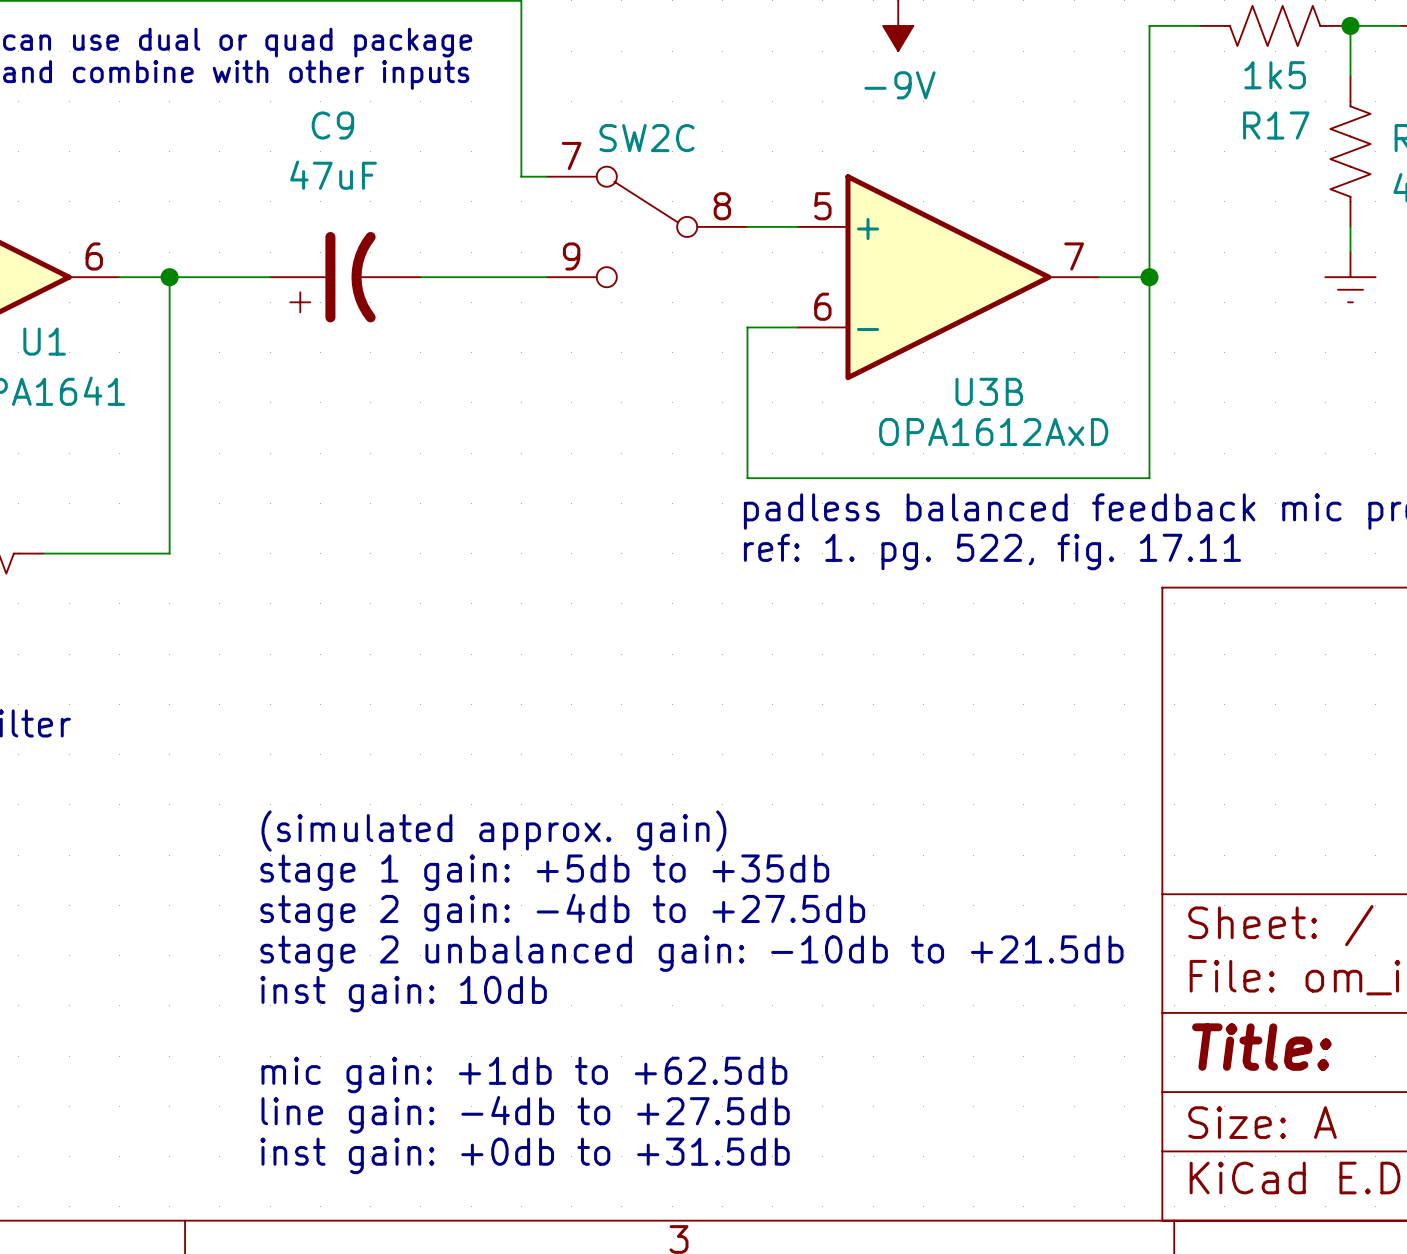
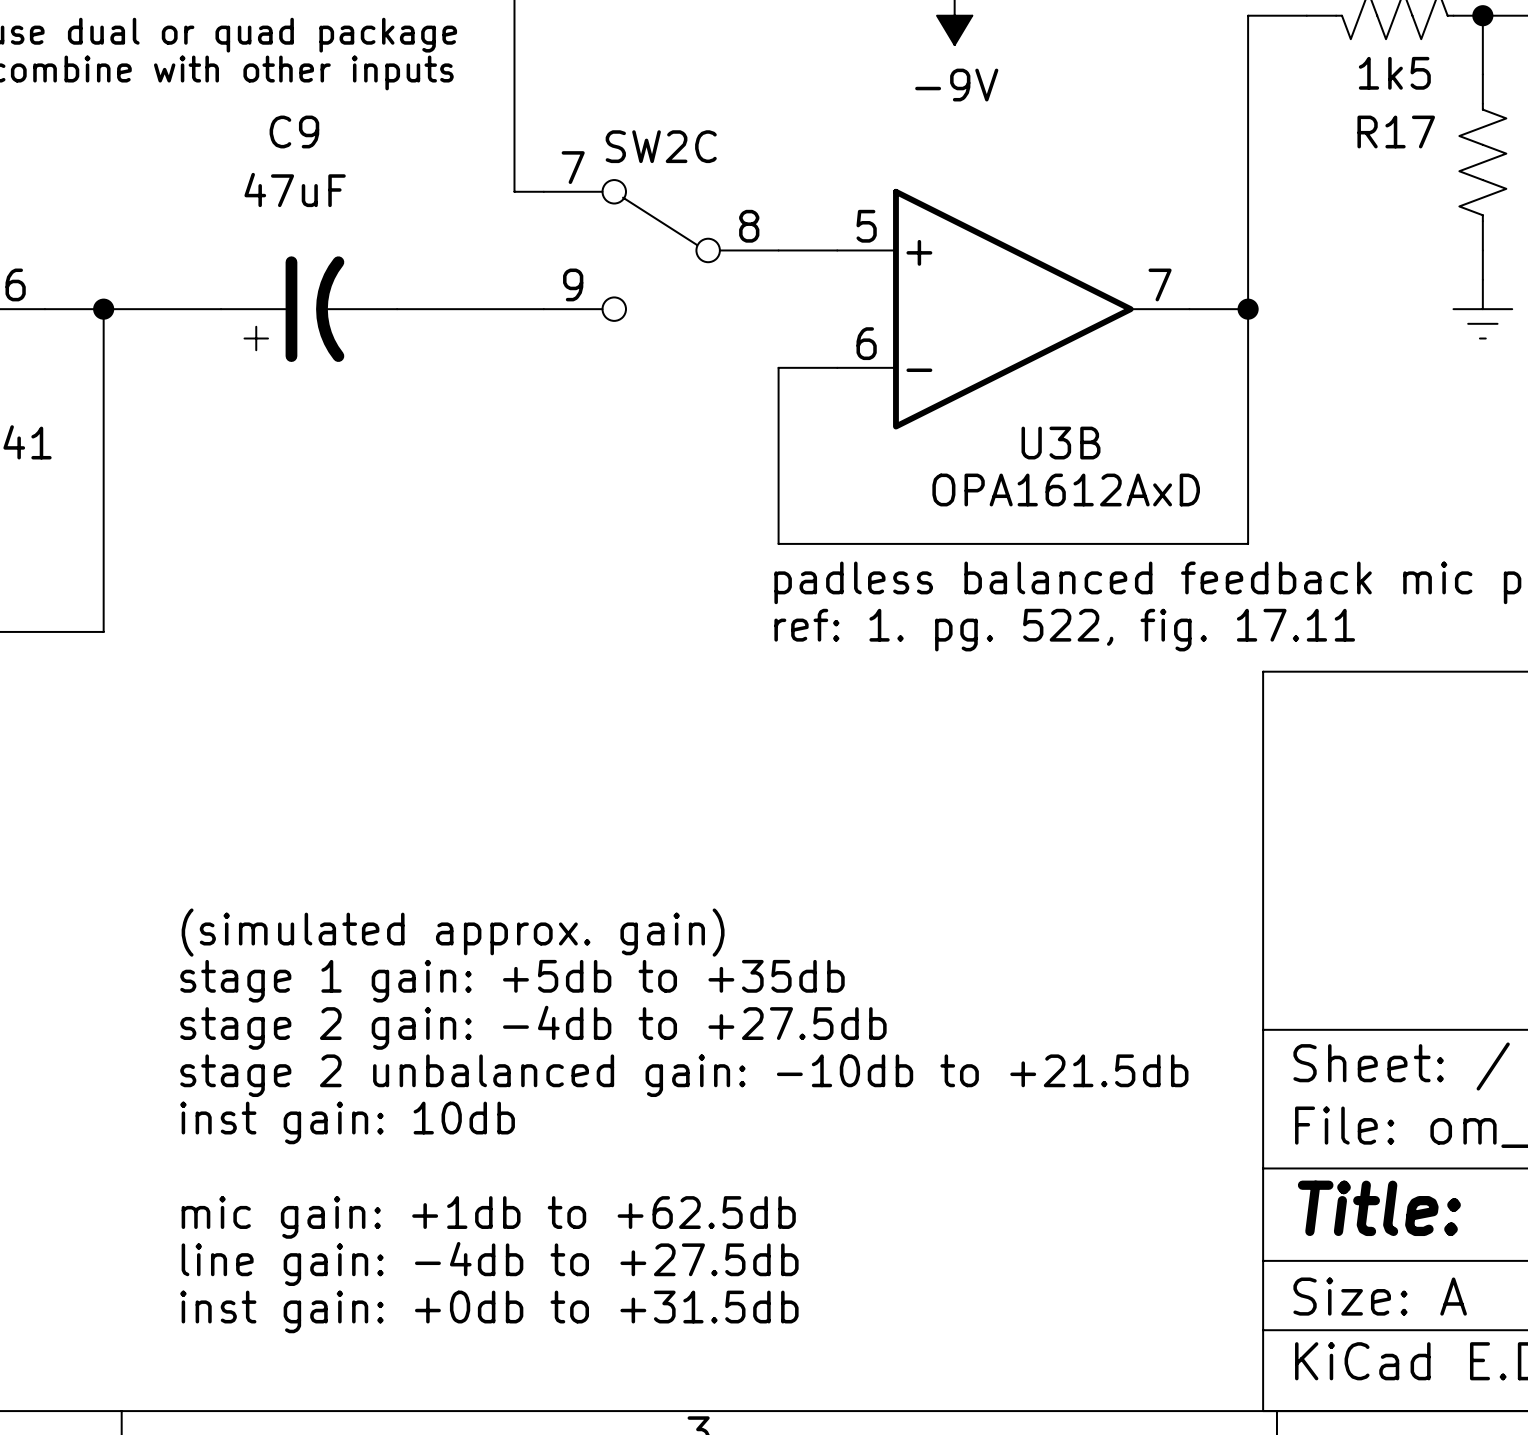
text position: (simulated approx. gain) (493, 831) -> (simulated approx. gain) (453, 932)
text position: stage 1 gain: +5db to +35db (544, 872) -> stage 1 gain: +5db to +35db (512, 981)
text position: stage 2 gain: -4db to +27.5db (562, 912) -> stage 2 gain: -4db to +27.5db (533, 1027)
text position: stage 2 unbalanced gain: -10db to +21.5db (691, 953) -> stage 2 unbalanced gain: -10db to +21.5db (684, 1075)
text position: inst gain: 10db (403, 994) -> inst gain: 10db (347, 1122)
text position: mic gain: +1db to +62.5db (524, 1074) -> mic gain: +1db to +62.5db (488, 1217)
text position: line gain: -4db to +27.5db (525, 1114) -> line gain: -4db to +27.5db (490, 1263)
text position: inst gain: +0db to +31.5db (525, 1155) -> inst gain: +0db to +31.5db (489, 1311)

